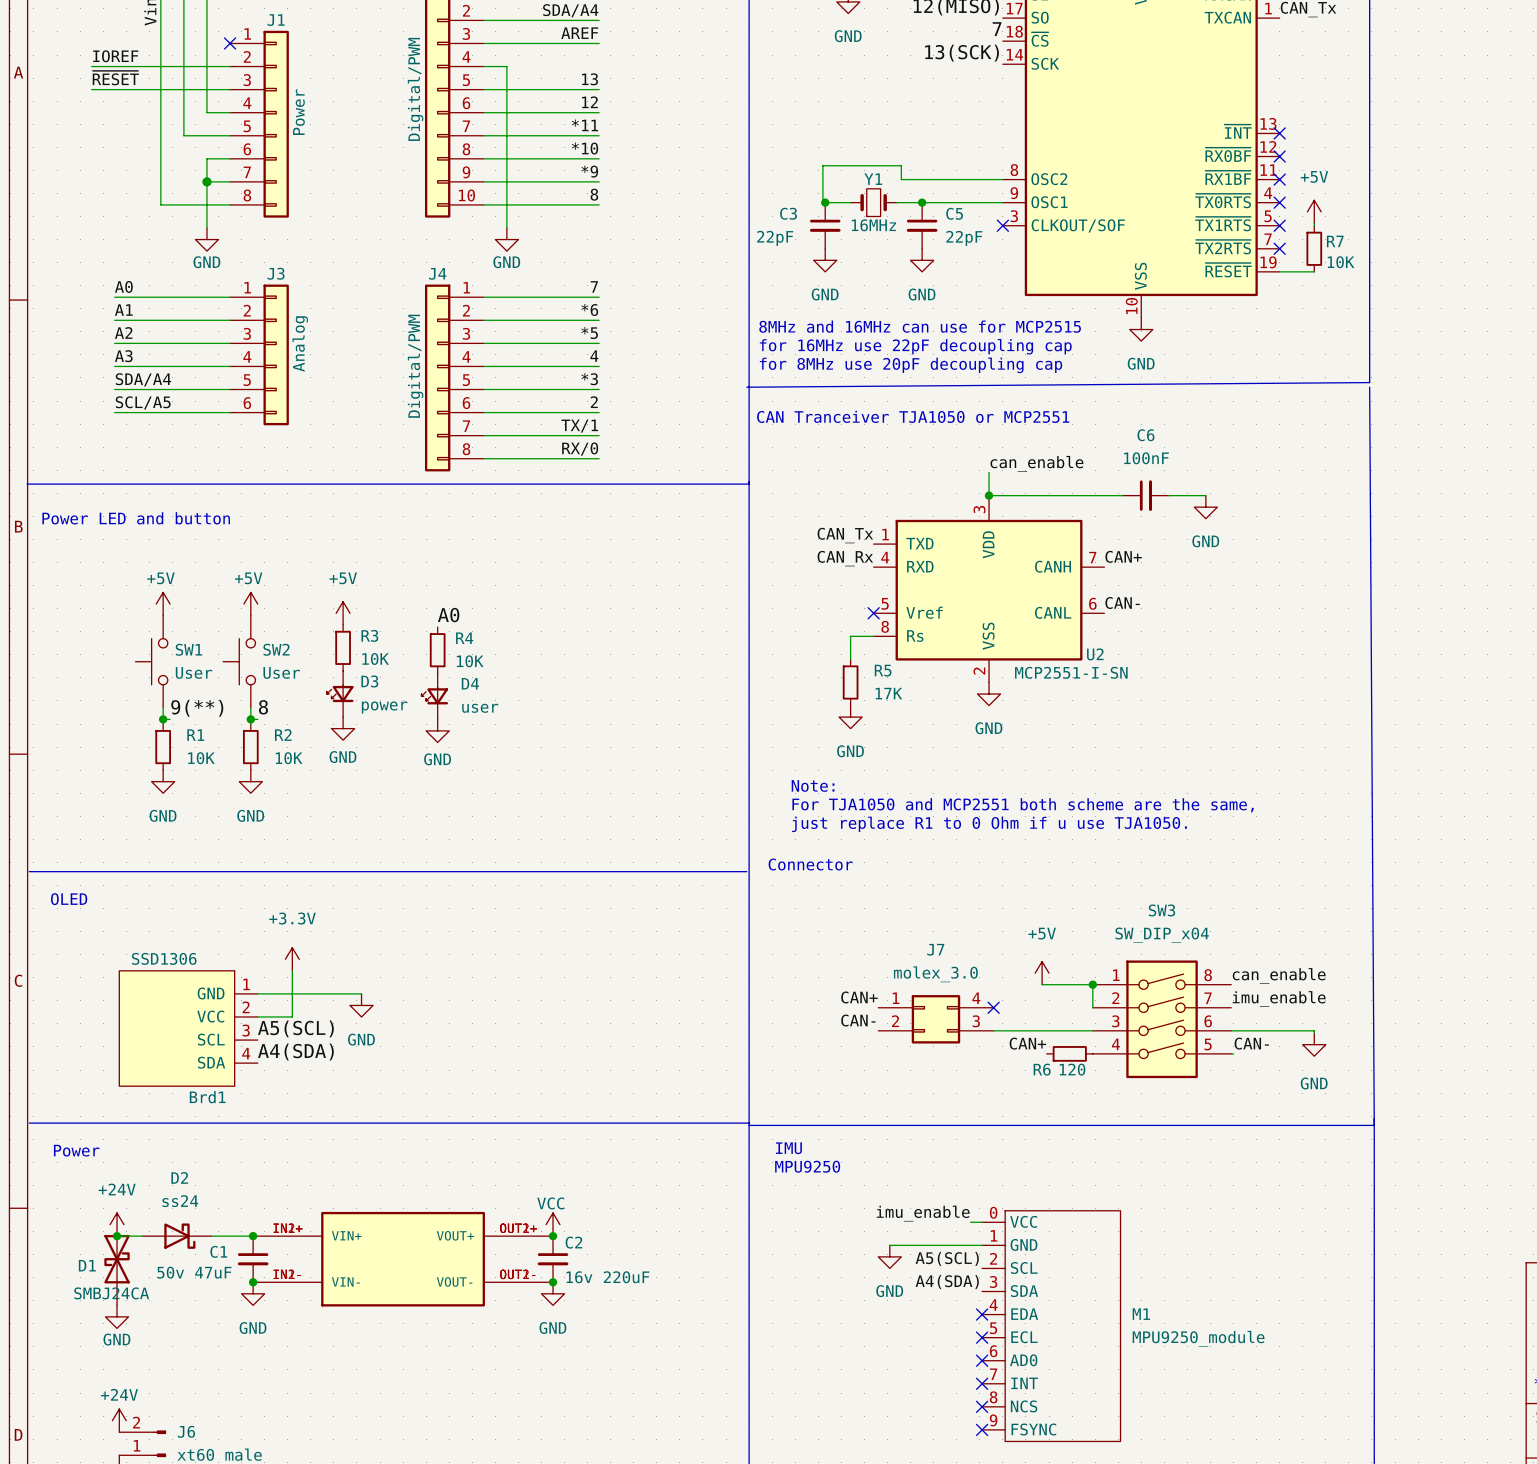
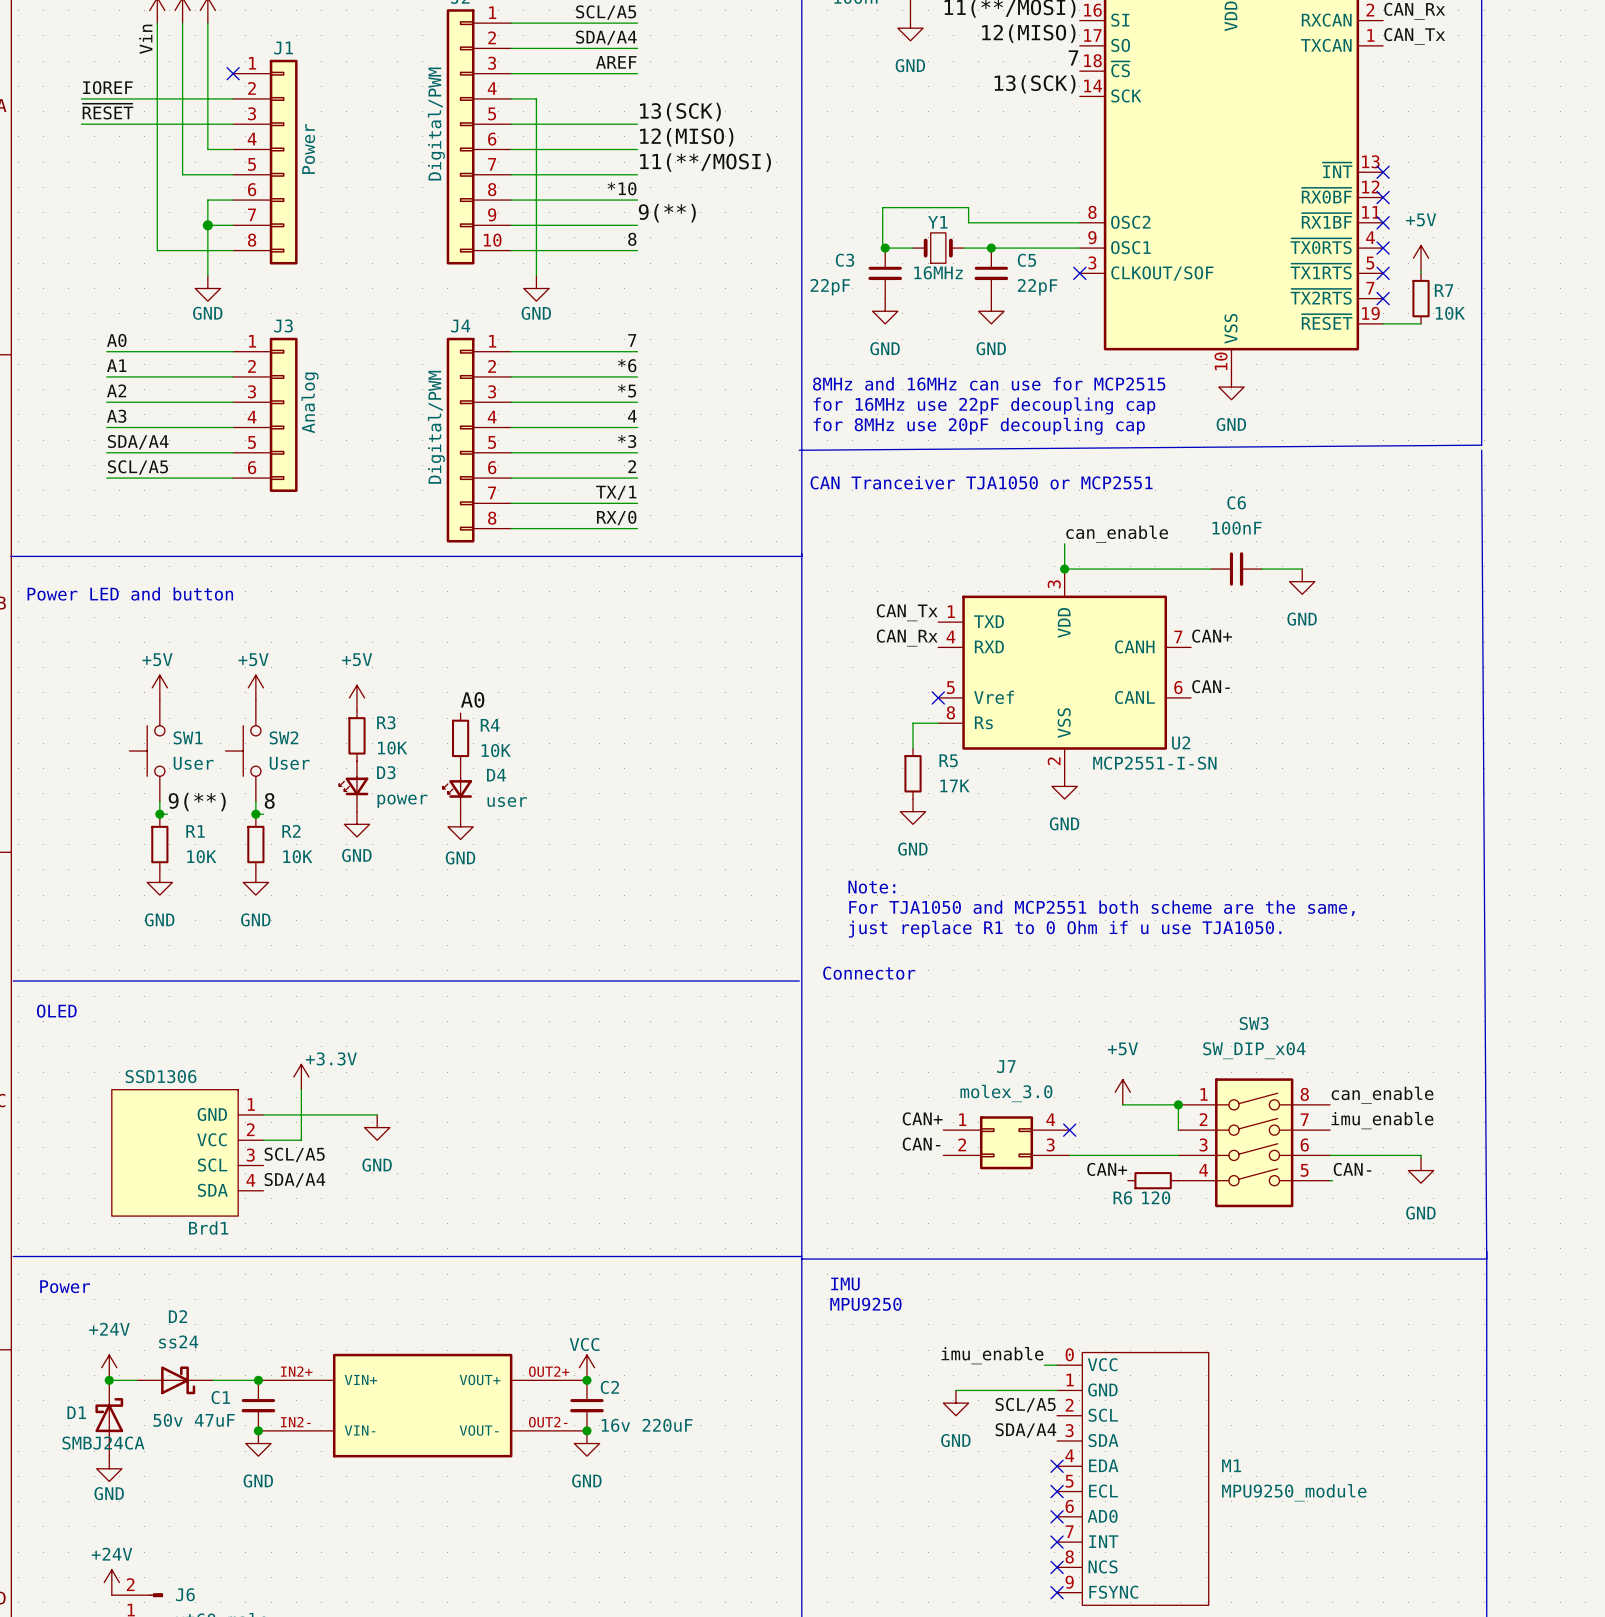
label: 13 (589, 79) -> 13(SCK) (680, 112)
label: 12 (589, 102) -> 12(MISO) (686, 137)
label: *11 (584, 125) -> 11(**/MOSI) (705, 162)
label: *9 (589, 171) -> 9(**) (667, 213)
power symbol text position: +3.3V (292, 918) -> +3.3V (331, 1058)
label: A5(SCL) (295, 1028) -> SCL/A5 (294, 1154)
label: A4(SDA) (295, 1052) -> SDA/A4 (294, 1180)
part symbol: [253, 1211, 554, 1307] -> [258, 1353, 587, 1458]
D1 symbol: [104, 1234, 130, 1306] -> [95, 1380, 124, 1457]
label: A5(SCL) (947, 1258) -> SCL/A5 (1025, 1405)
label: A4(SDA) (947, 1282) -> SDA/A4 (1025, 1430)

